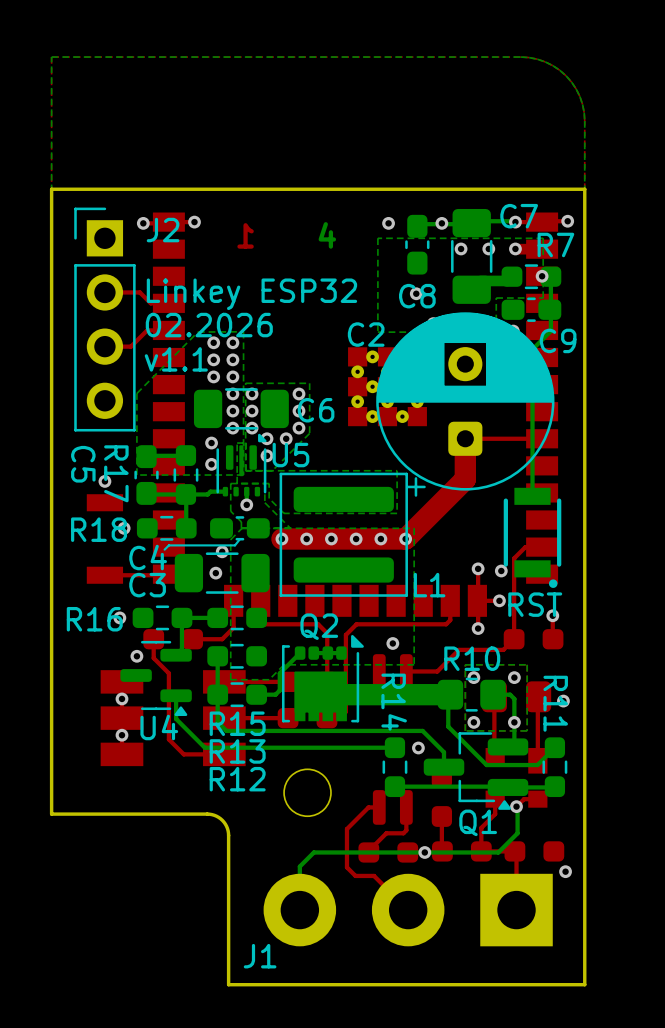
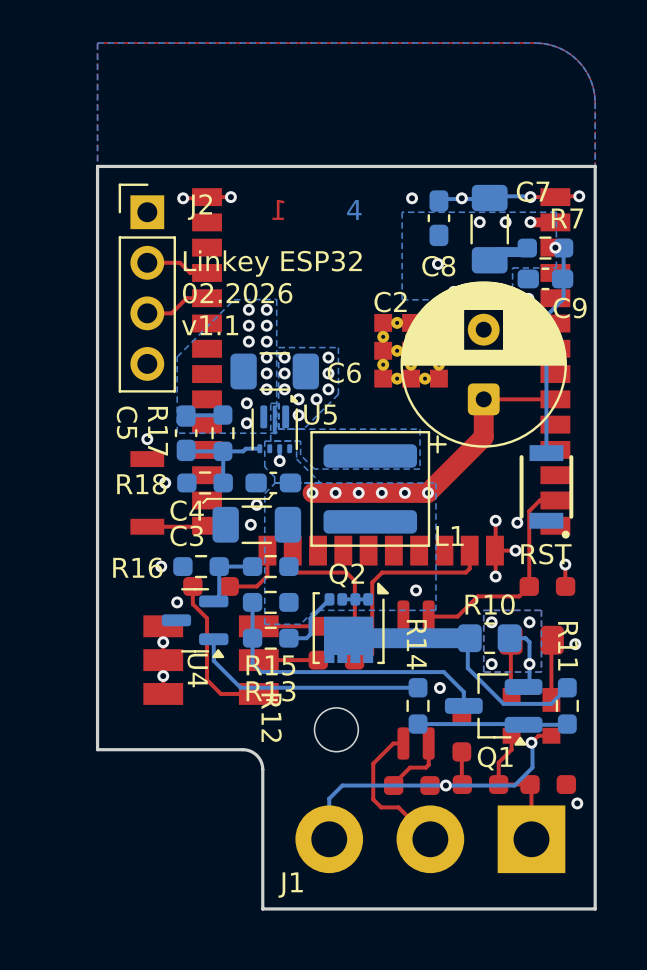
U4 name rotation: 0° (159, 727) -> 90° clockwise (197, 670)
R12 name rotation: 0° (237, 779) -> 90° clockwise (271, 717)

